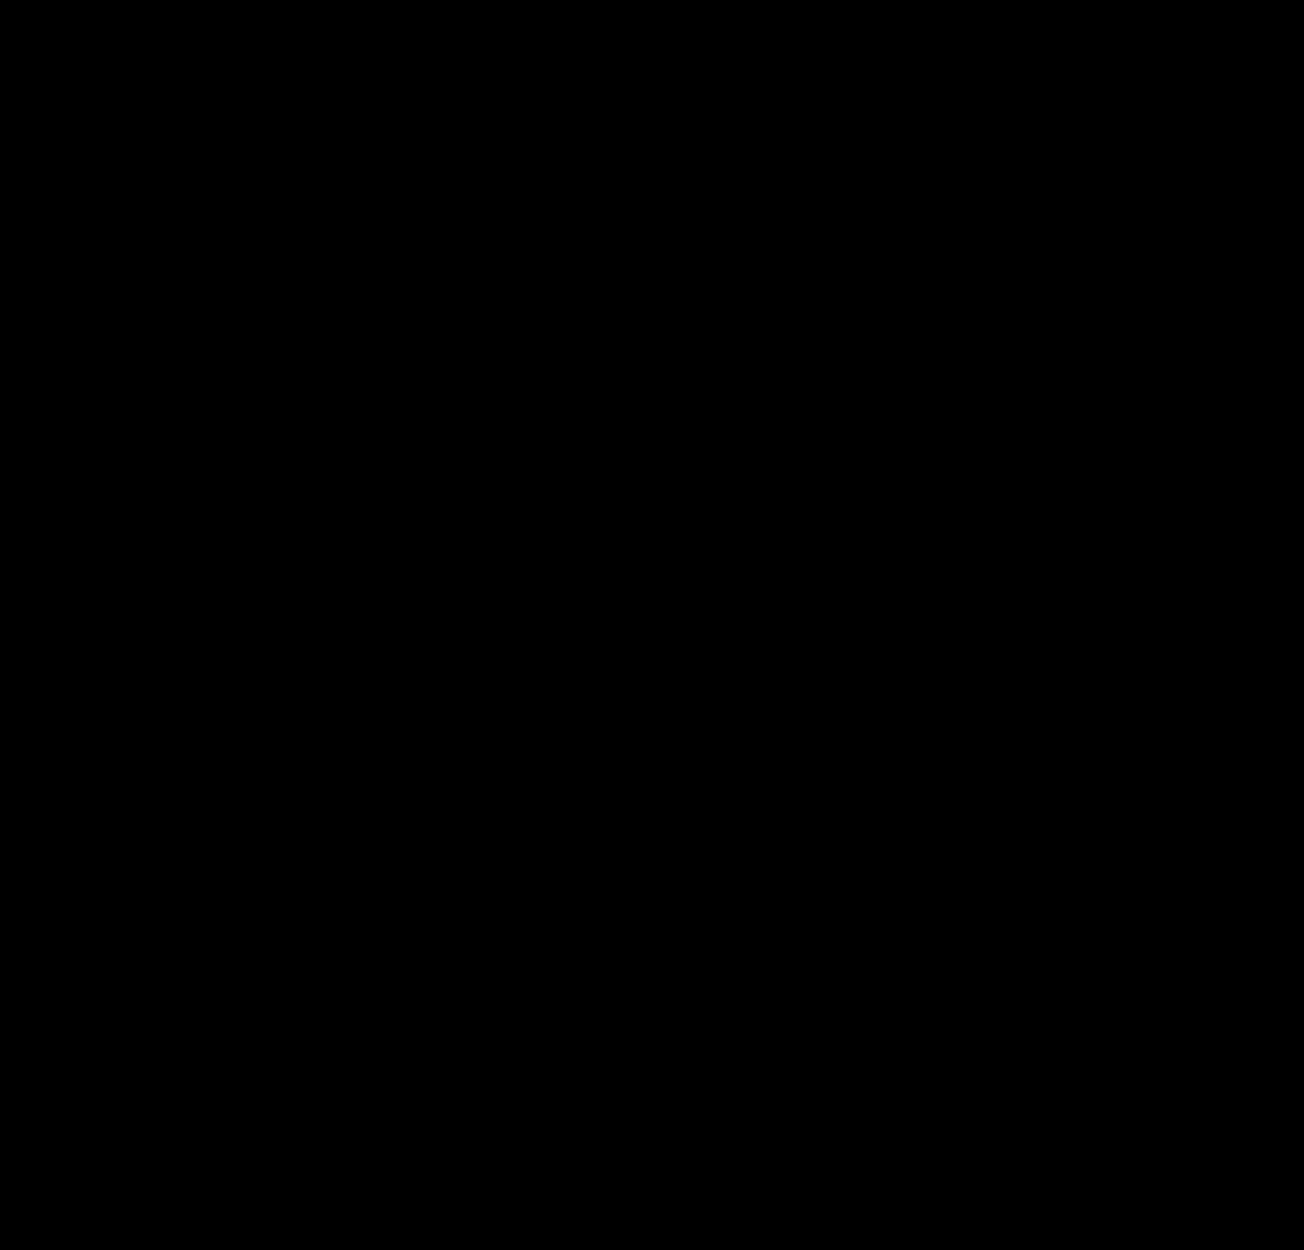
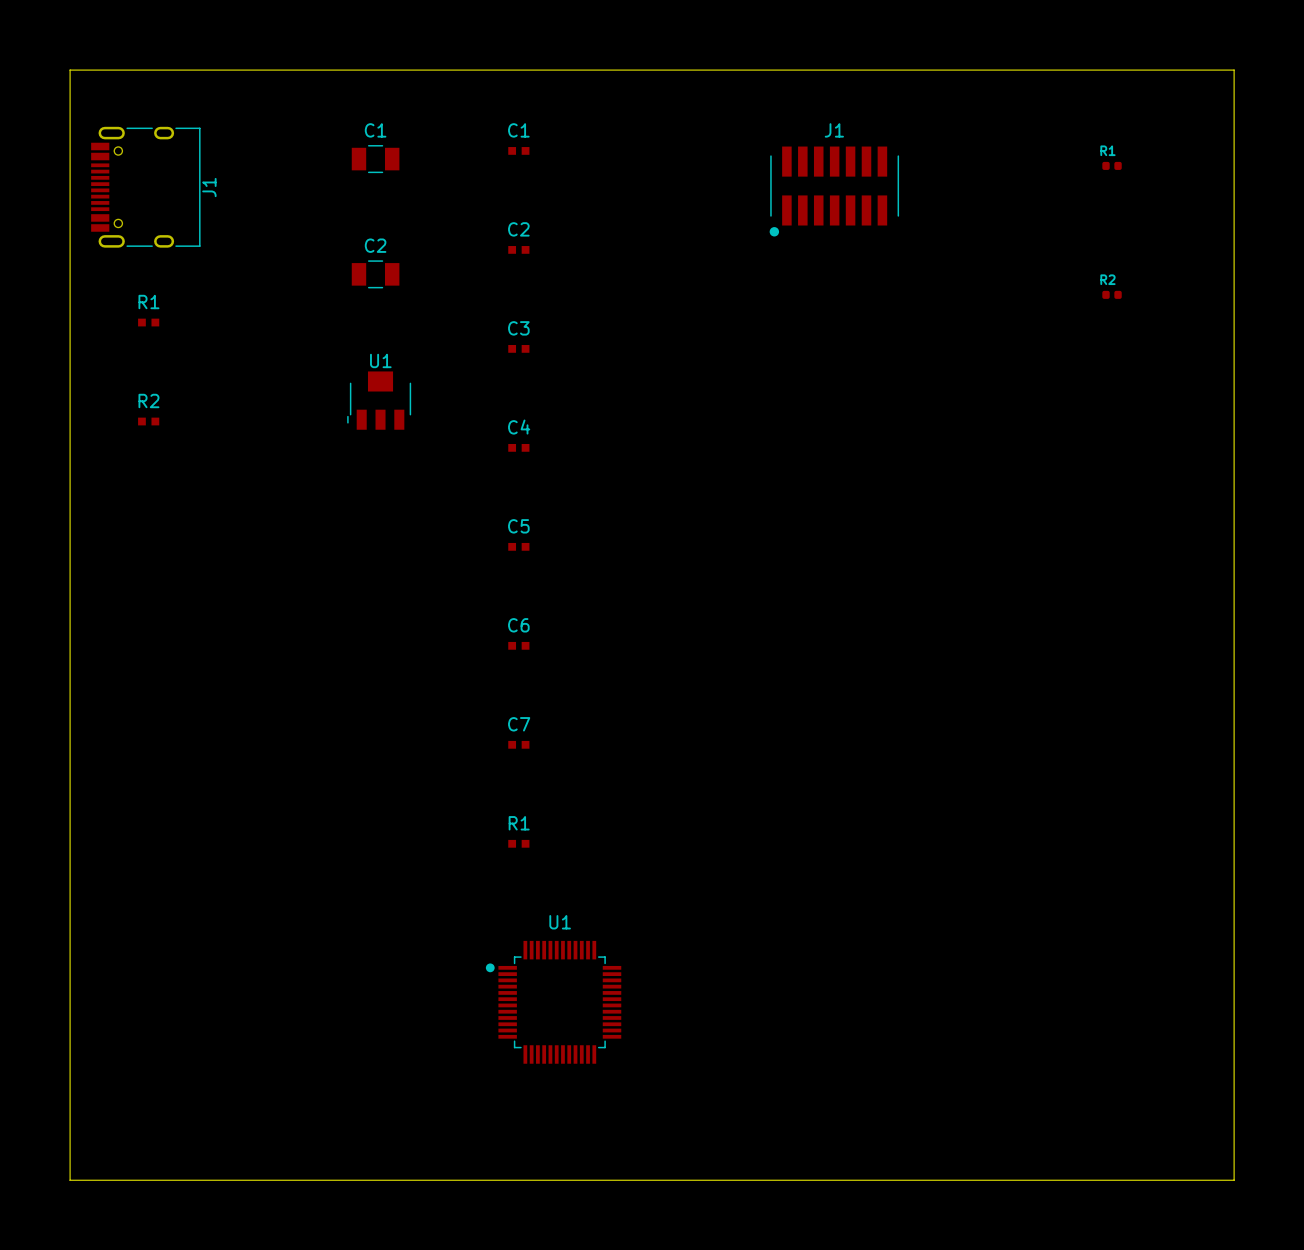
board edge: none -> (70, 70) (1234, 70) (1234, 1180) (70, 1180) (70, 70)
C1: none -> (518, 150)
C1: none -> (375, 159)
R1: none -> (1112, 165)
J1: none -> (145, 187)
J1: none -> (834, 191)
C2: none -> (518, 249)
C2: none -> (375, 274)
R2: none -> (1112, 294)
R1: none -> (148, 322)
C3: none -> (518, 348)
U1: none -> (379, 400)
R2: none -> (148, 421)
C4: none -> (518, 447)
C5: none -> (518, 546)
C6: none -> (518, 645)
C7: none -> (518, 744)
R1: none -> (518, 843)
U1: none -> (553, 1002)

